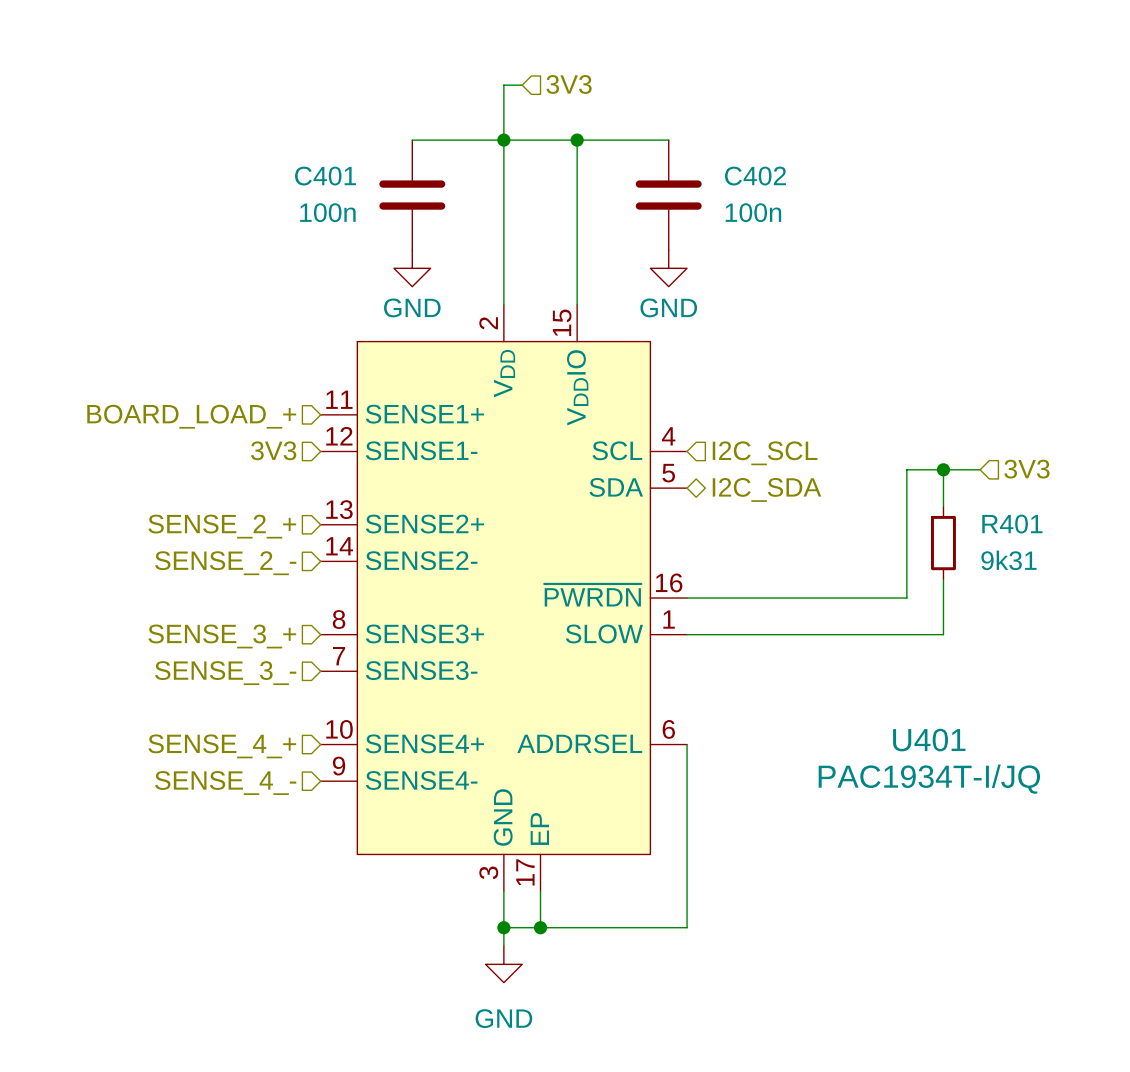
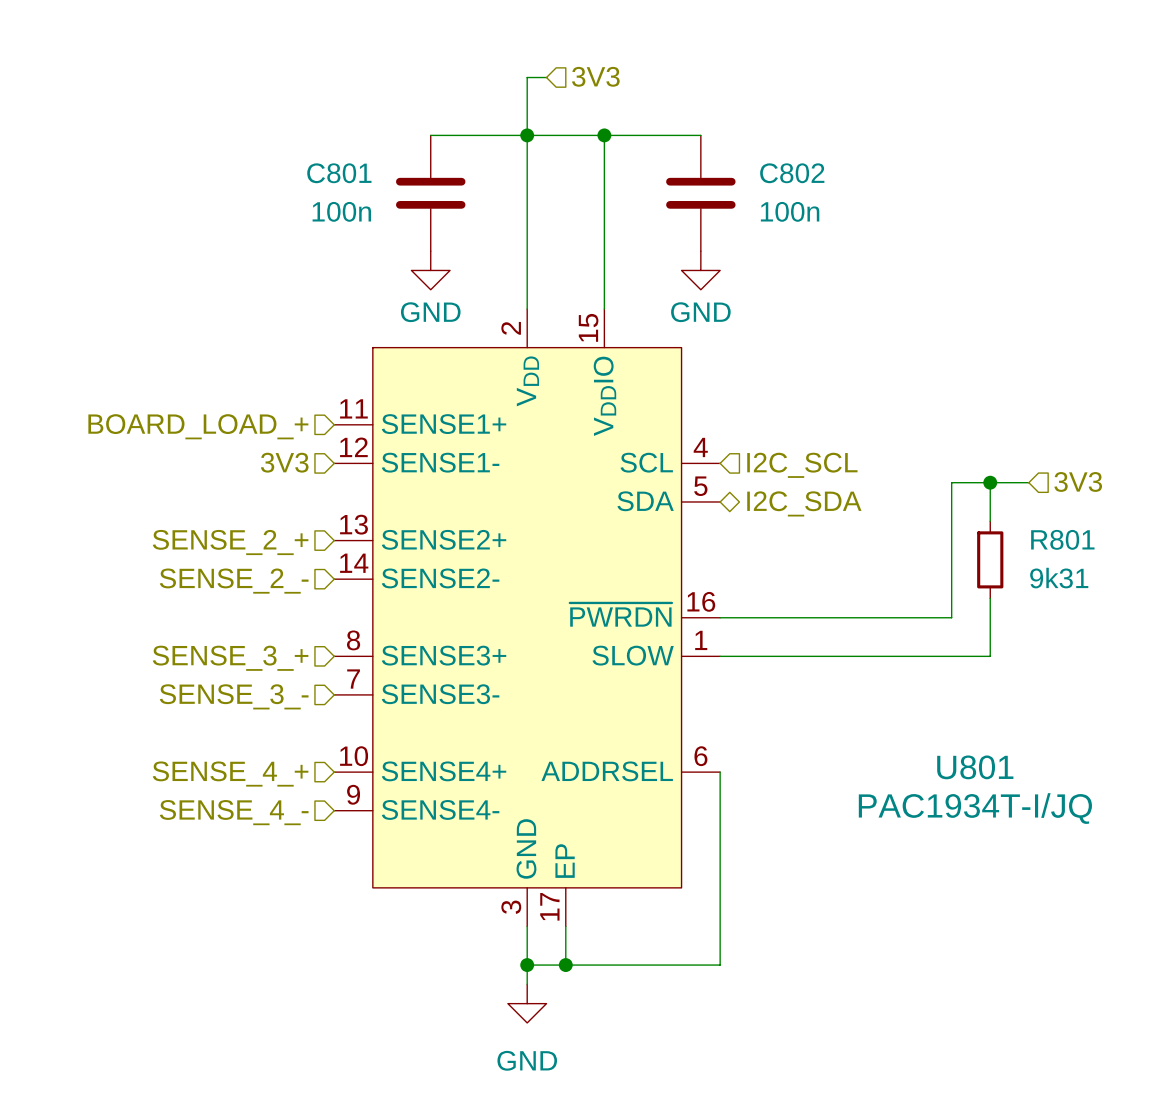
C401 name: C401 (325, 176) -> C801 (339, 173)
C402 name: C402 (755, 176) -> C802 (792, 173)
R401 name: R401 (1012, 524) -> R801 (1062, 539)
U401 name: U401 (929, 740) -> U801 (975, 767)

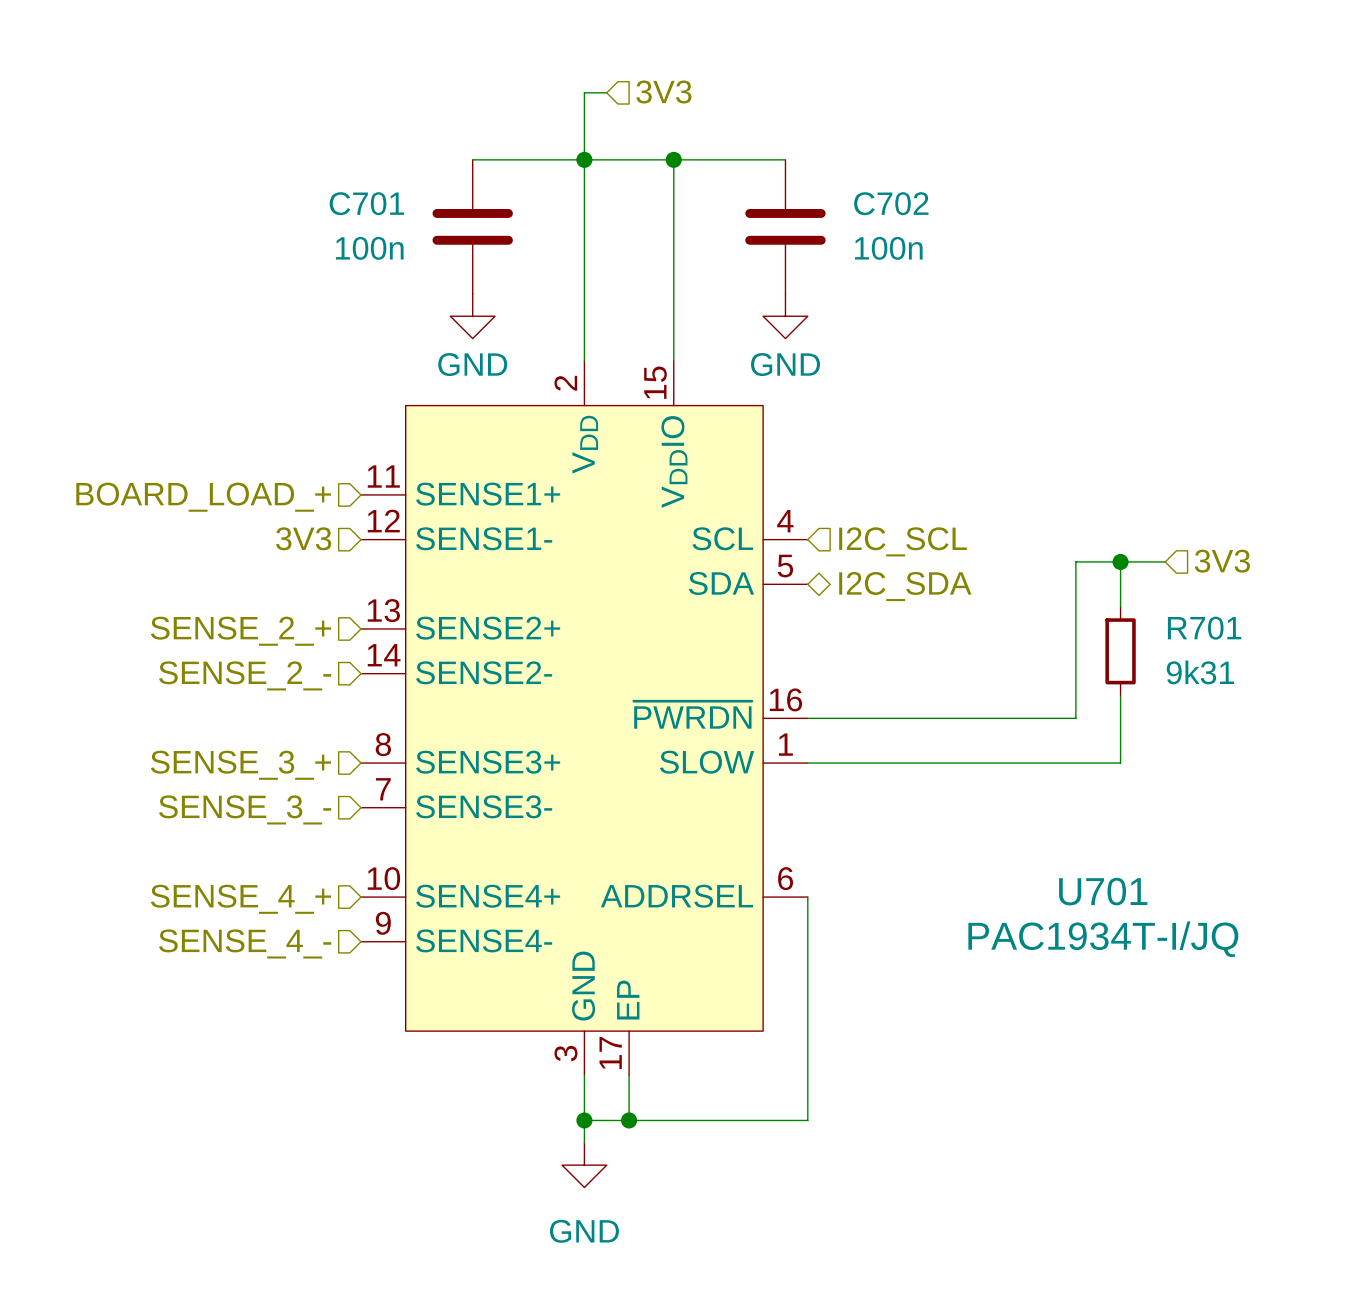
C801 name: C801 (339, 173) -> C701 (366, 203)
C802 name: C802 (792, 173) -> C702 (891, 203)
R801 name: R801 (1062, 539) -> R701 (1204, 628)
U801 name: U801 (975, 767) -> U701 (1103, 891)

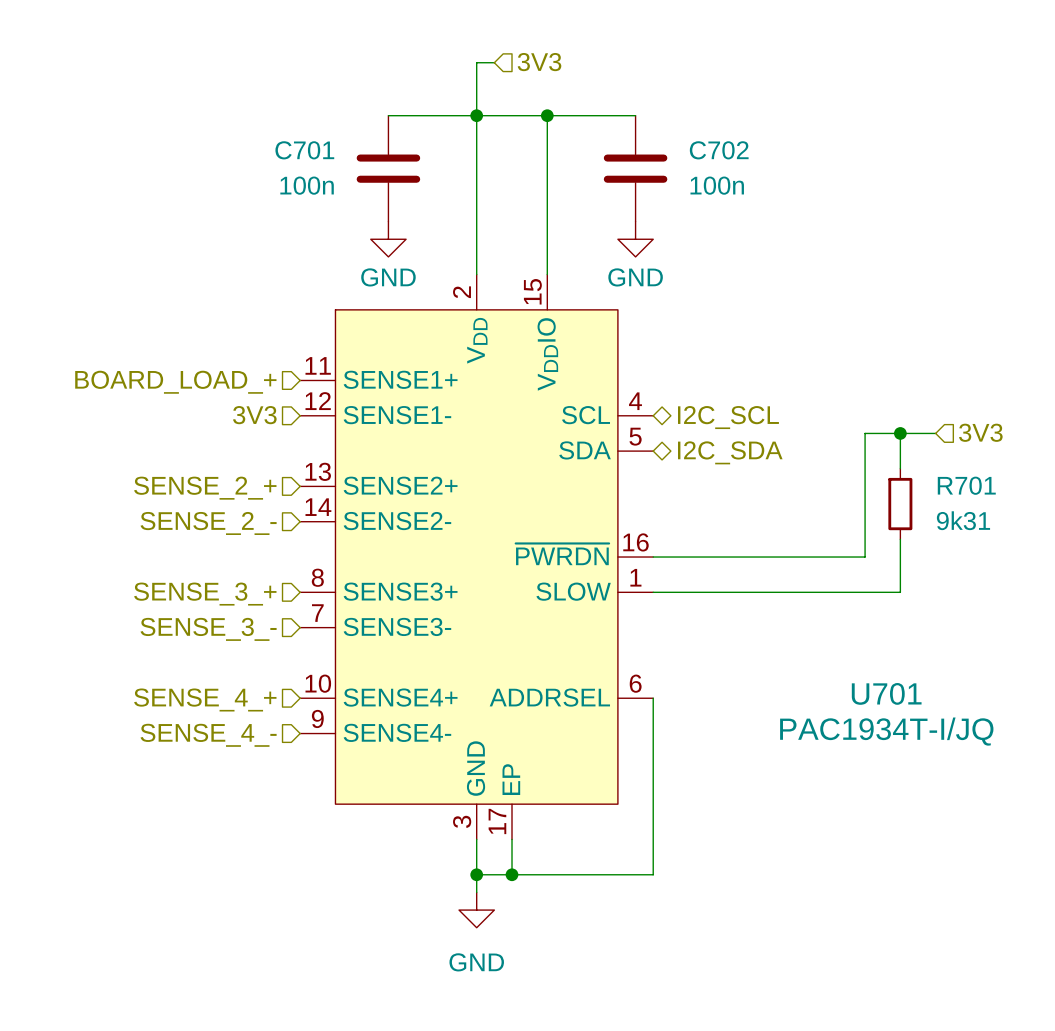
hierarchical label shape: input (903, 541) -> bidirectional (728, 417)

